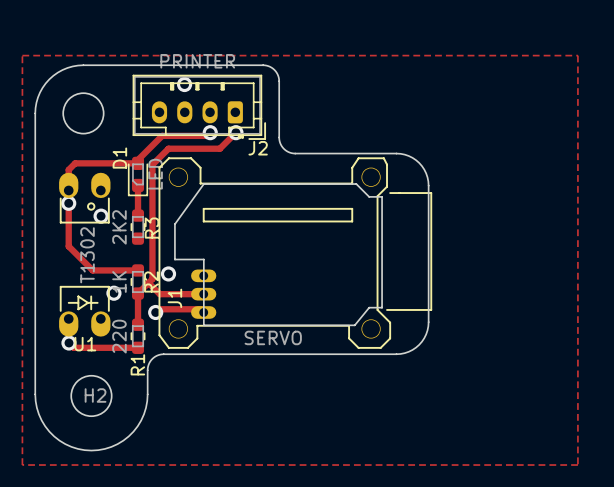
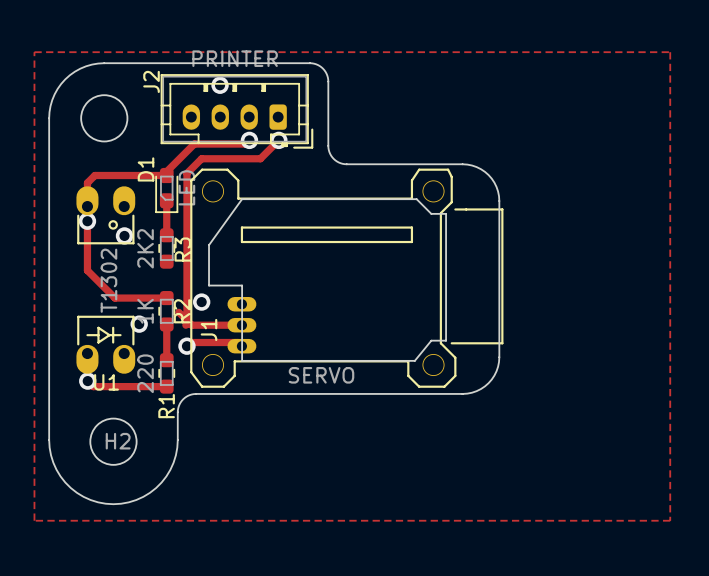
J2 name rotation: 0° (258, 148) -> 90° counterclockwise (151, 81)
J2 name position: J2 (258, 148) -> J2 (151, 81)
track: (155, 161) (152, 164) (152, 279) (138, 294) -> (186, 173) (185, 325)

